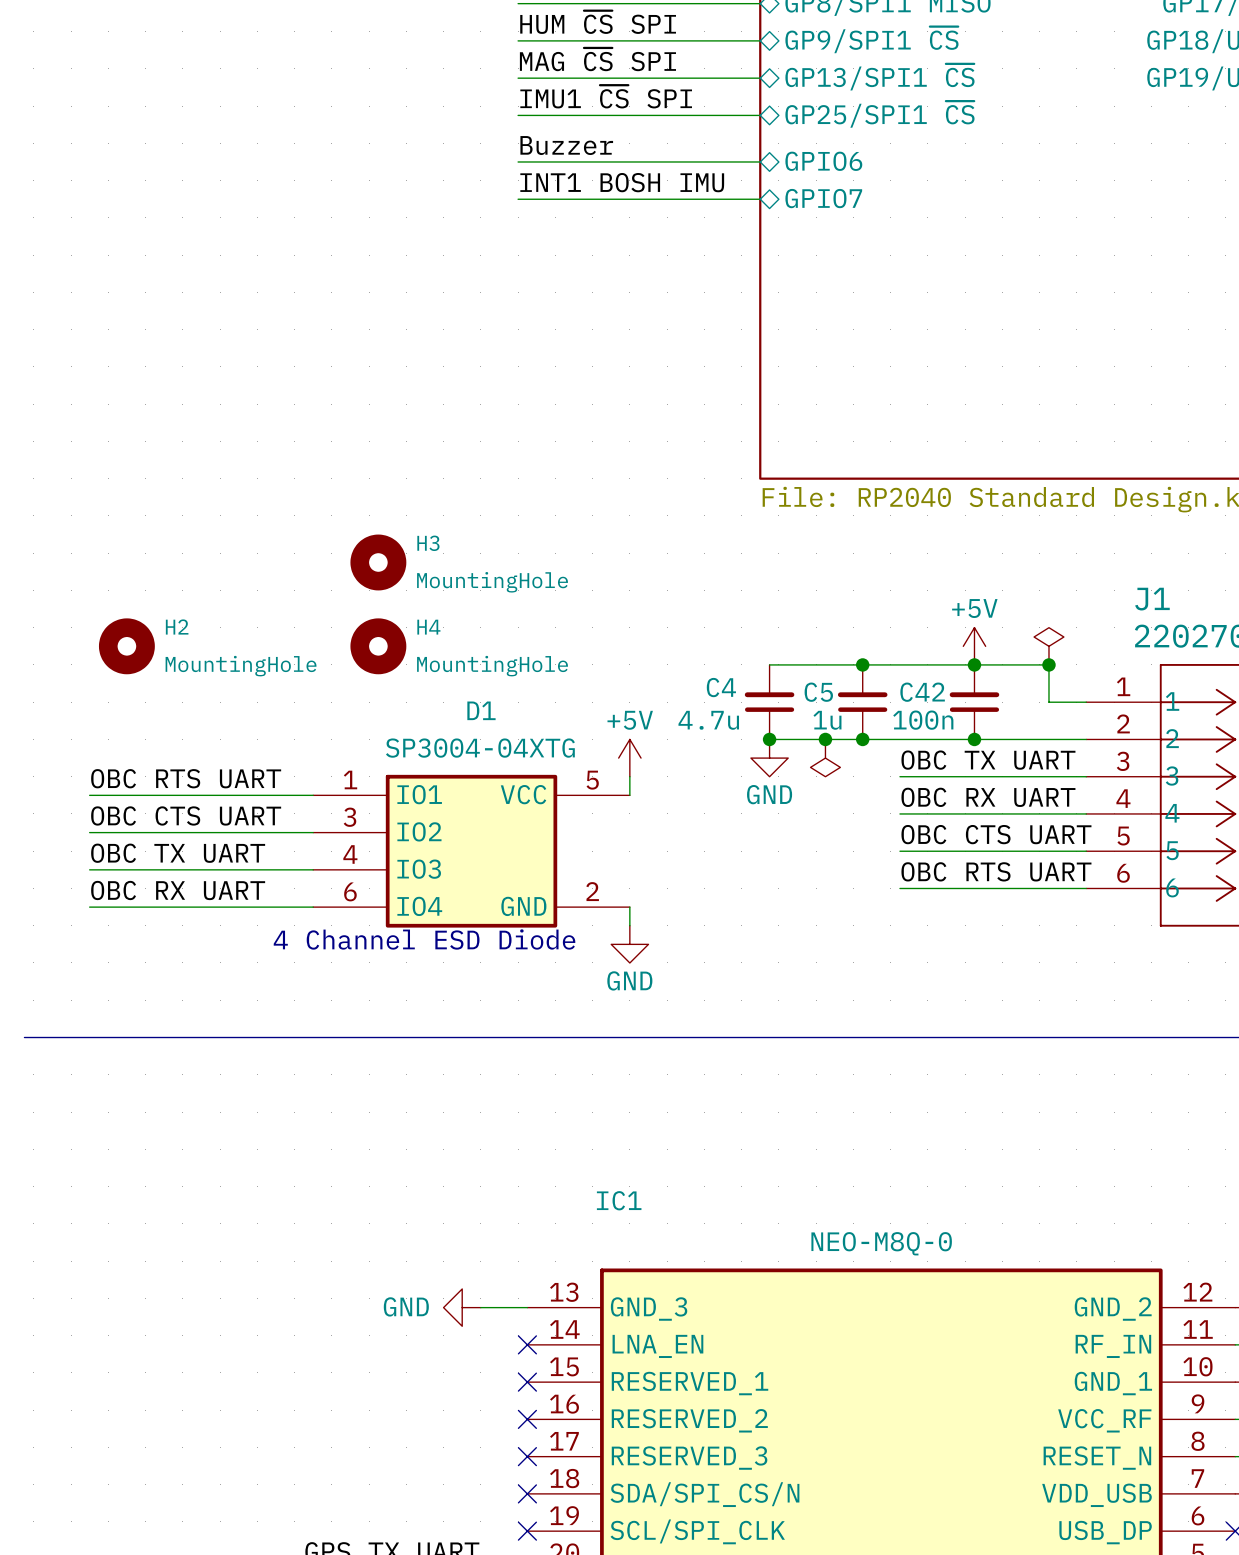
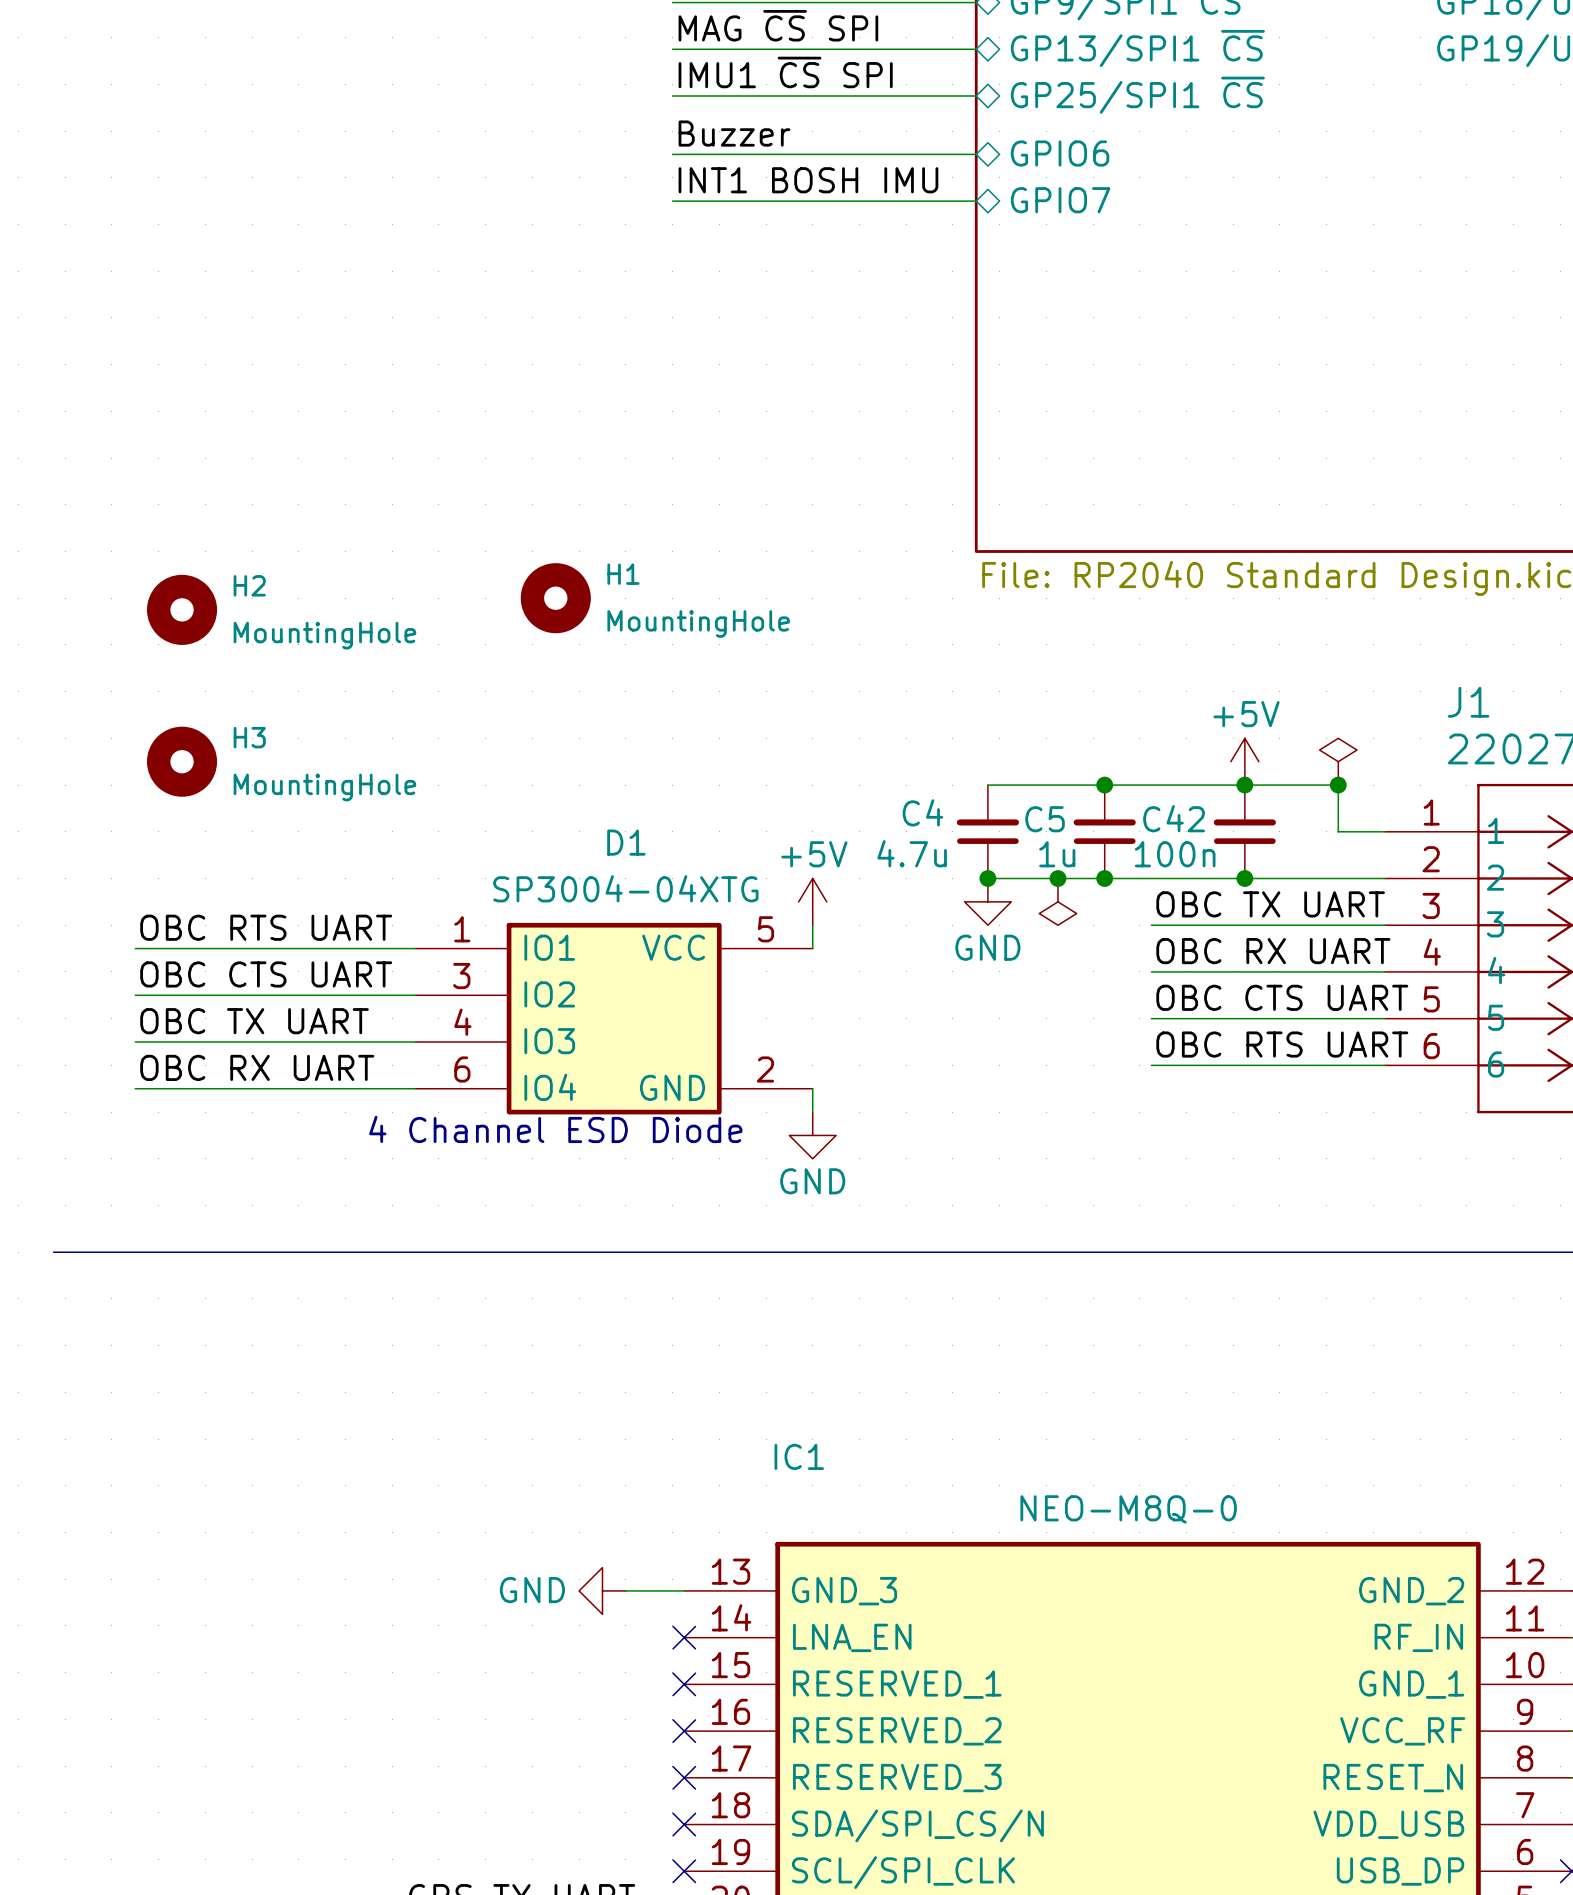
H1: none -> MountingHole (555, 598)
H2: none -> MountingHole (182, 609)
H3: MountingHole (378, 562) -> none
H2 name: H2 (177, 627) -> H3 (249, 737)
H4: MountingHole (378, 646) -> none

